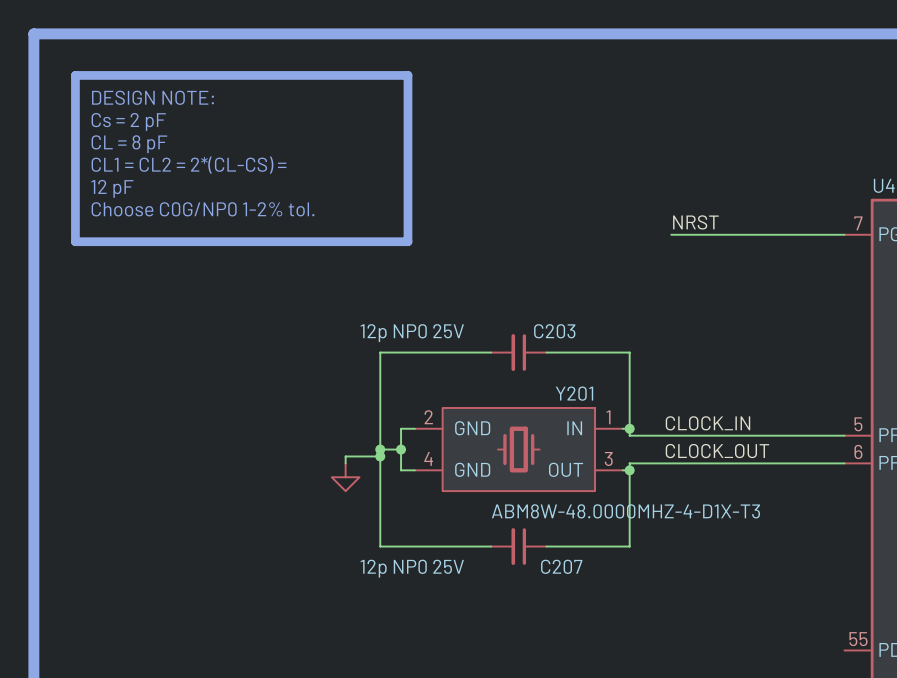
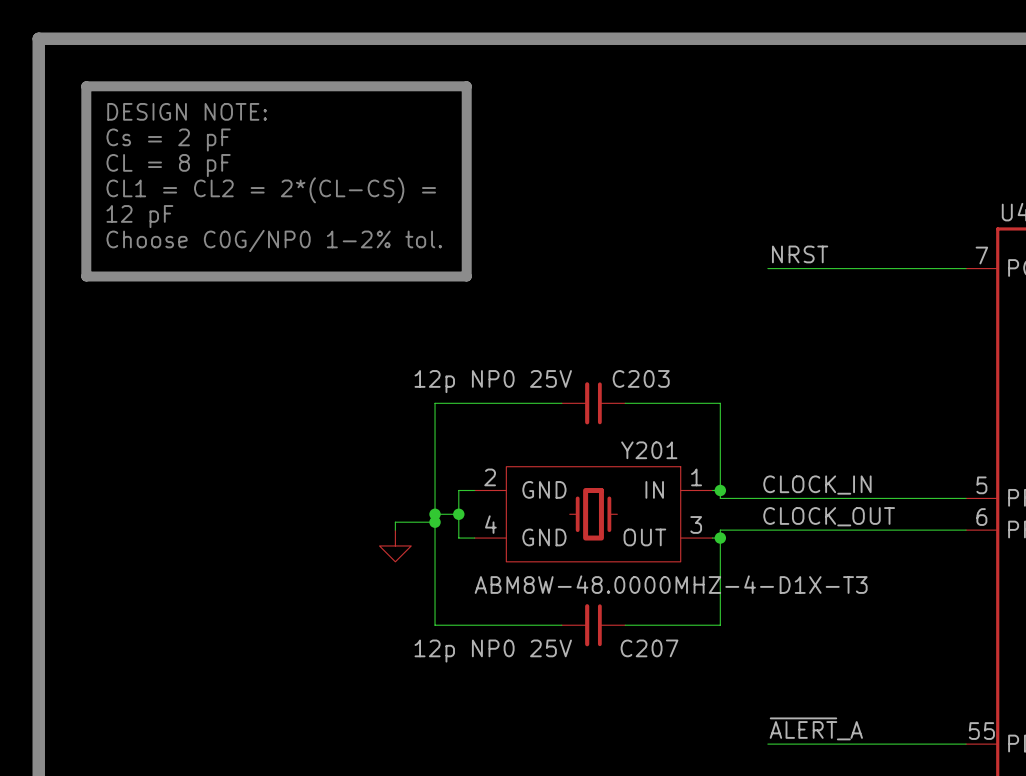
label: none -> ~{ALERT}_A (816, 728)
wire: none -> (767, 744) (966, 744)

